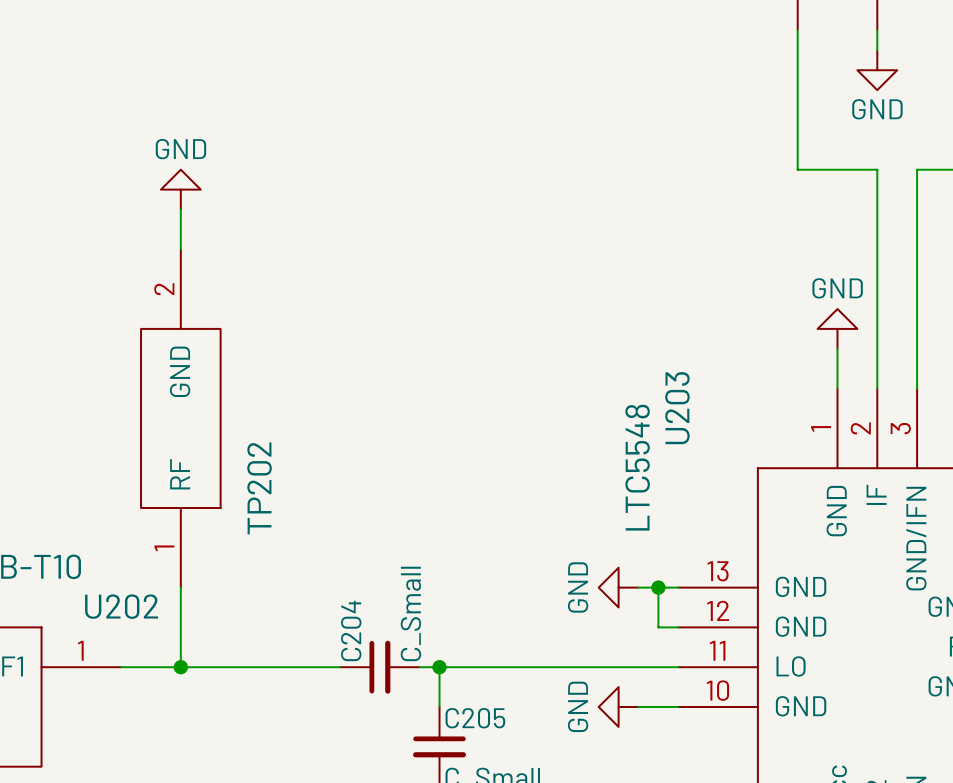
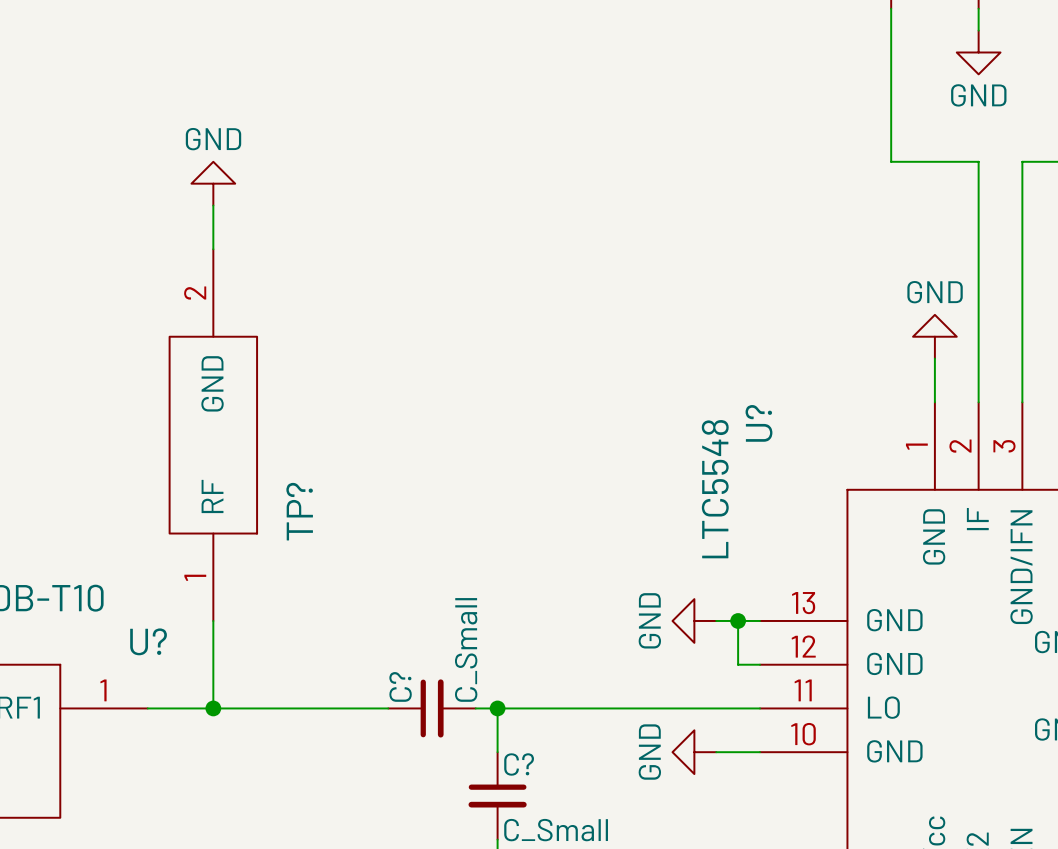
U203 name: U203 (677, 408) -> U? (758, 423)
TP202 name: TP202 (259, 488) -> TP? (299, 511)
U202 name: U202 (121, 606) -> U? (148, 641)
C204 name: C204 (351, 630) -> C? (400, 686)
C205 name: C205 (475, 718) -> C? (519, 764)

